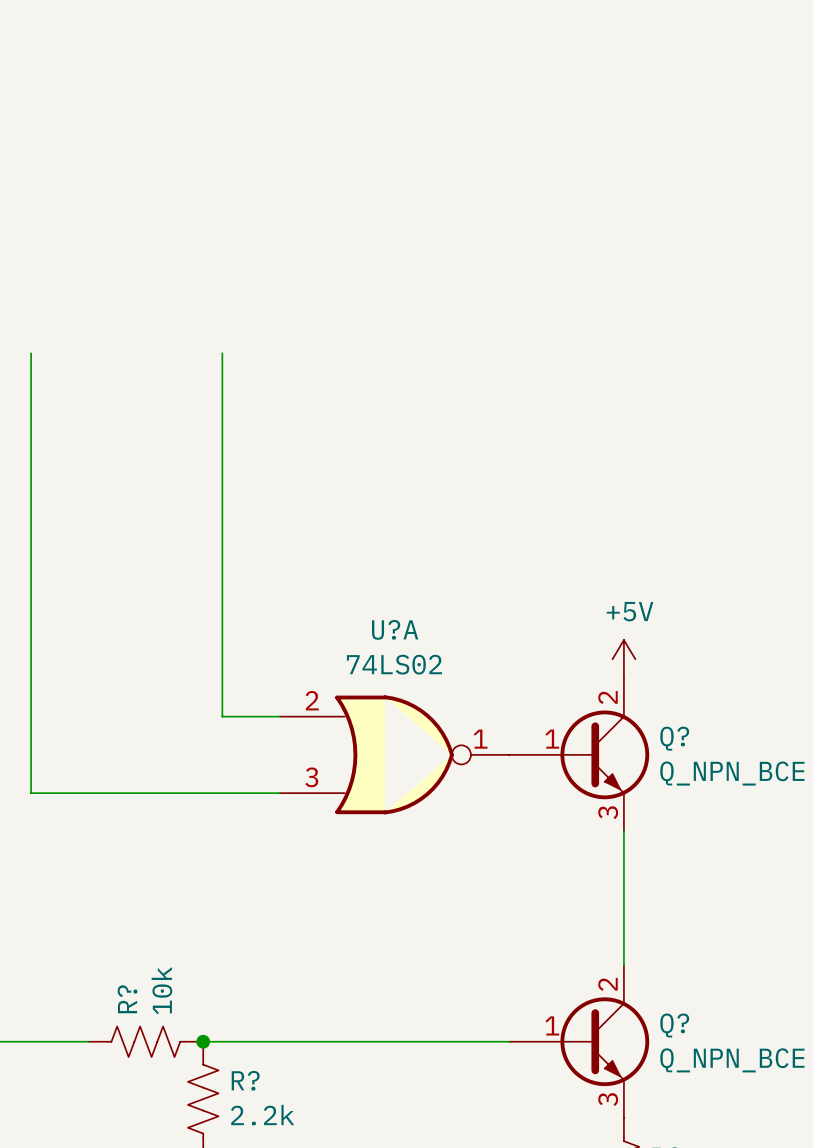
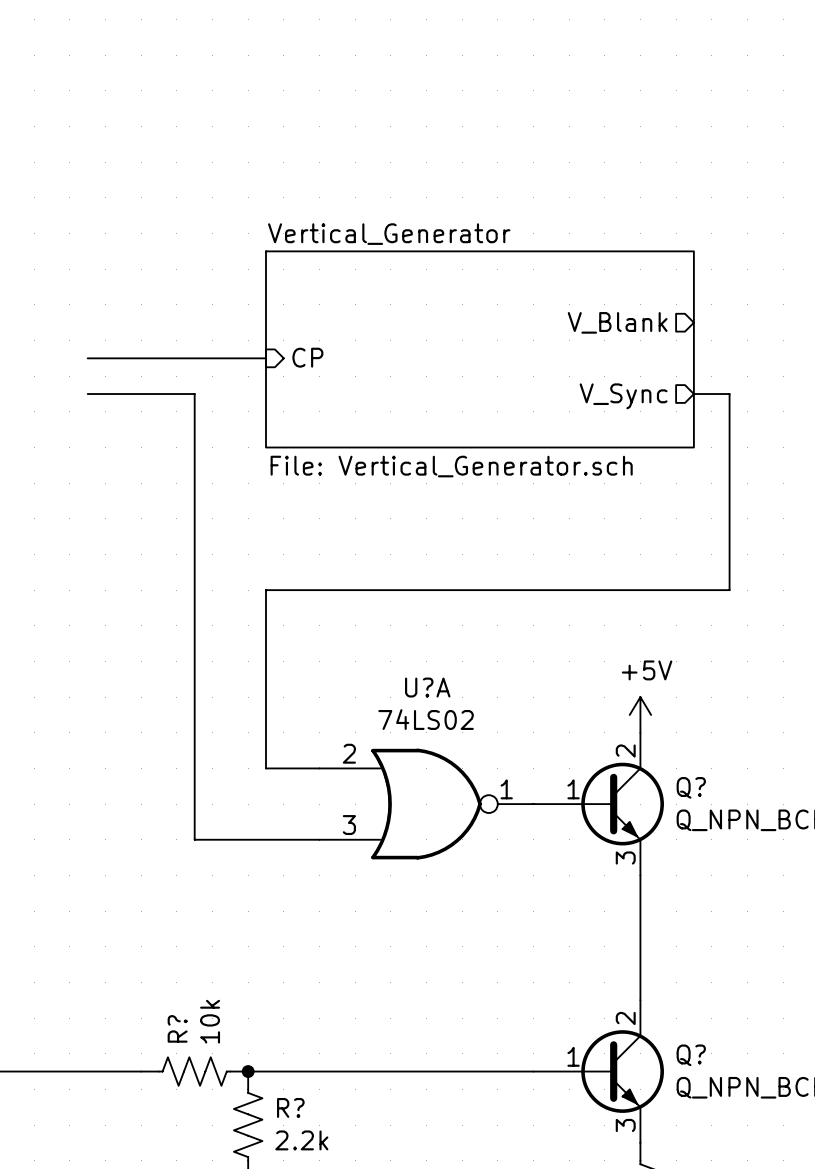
sheet pin: none -> V_Blank (617, 322)
sheet Vertical_Generator: none -> File: Vertical_Generator.sch (479, 349)
wire: none -> (87, 358) (266, 358)
sheet pin: none -> CP (307, 357)
sheet pin: none -> V_Sync (623, 396)
wire: (31, 353) (31, 793) (145, 793) -> (87, 394) (194, 394) (194, 839)
wire: (222, 353) (222, 525) -> (693, 394) (729, 394) (729, 590) (266, 590)

